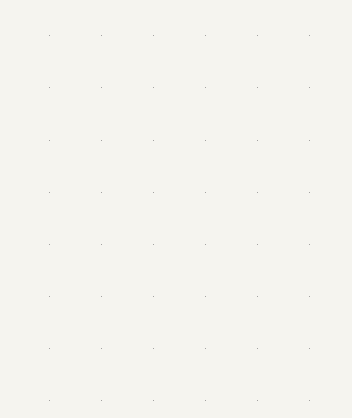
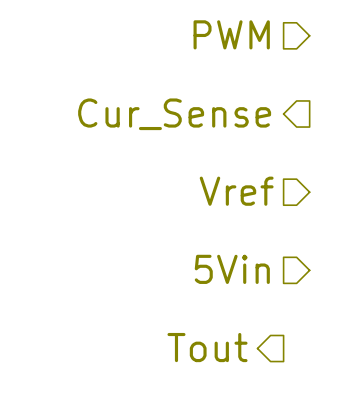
hierarchical label: none -> PWM (231, 34)
hierarchical label: none -> Cur_Sense (174, 114)
hierarchical label: none -> Vref (236, 191)
hierarchical label: none -> 5Vin (232, 269)
hierarchical label: none -> Tout (207, 347)

